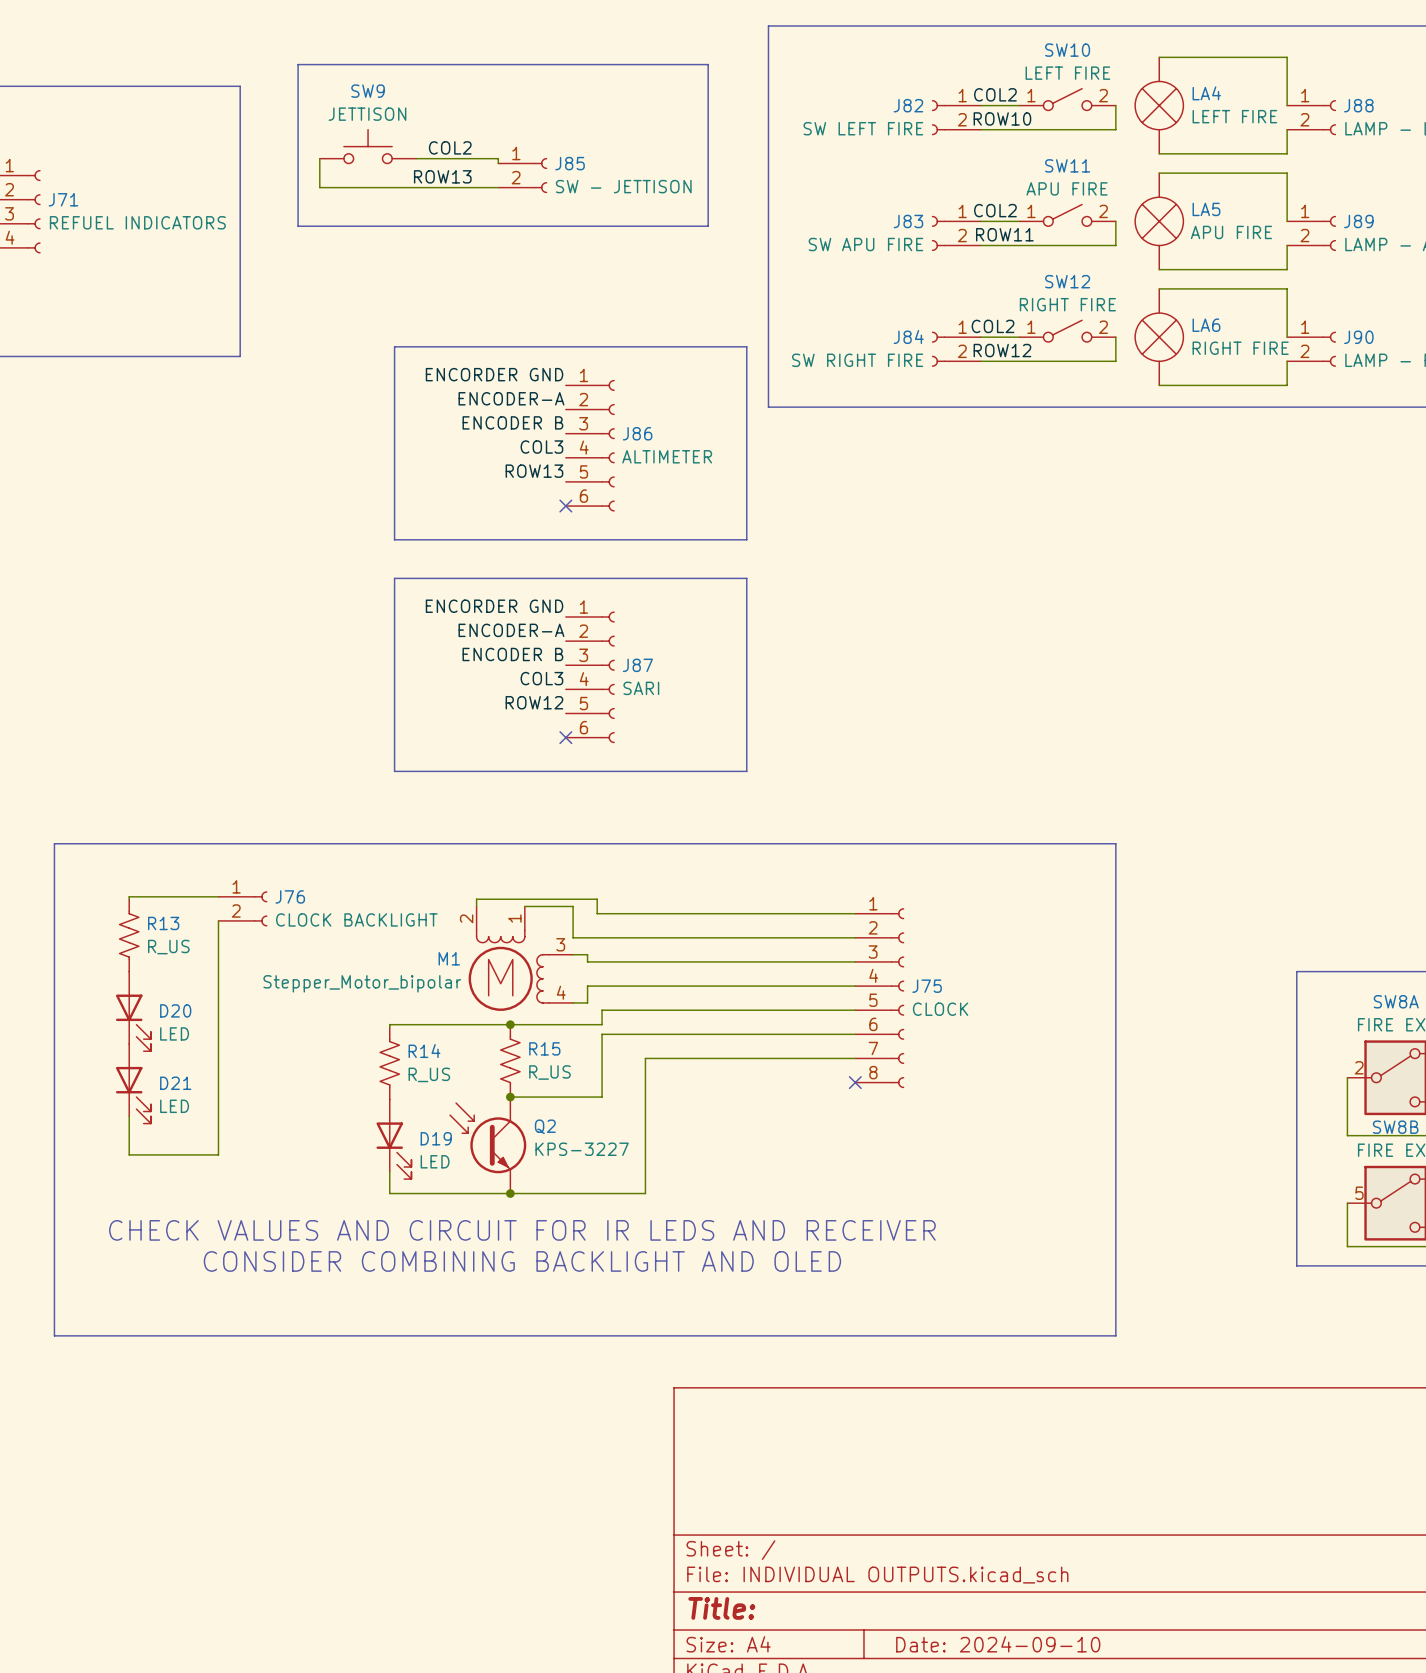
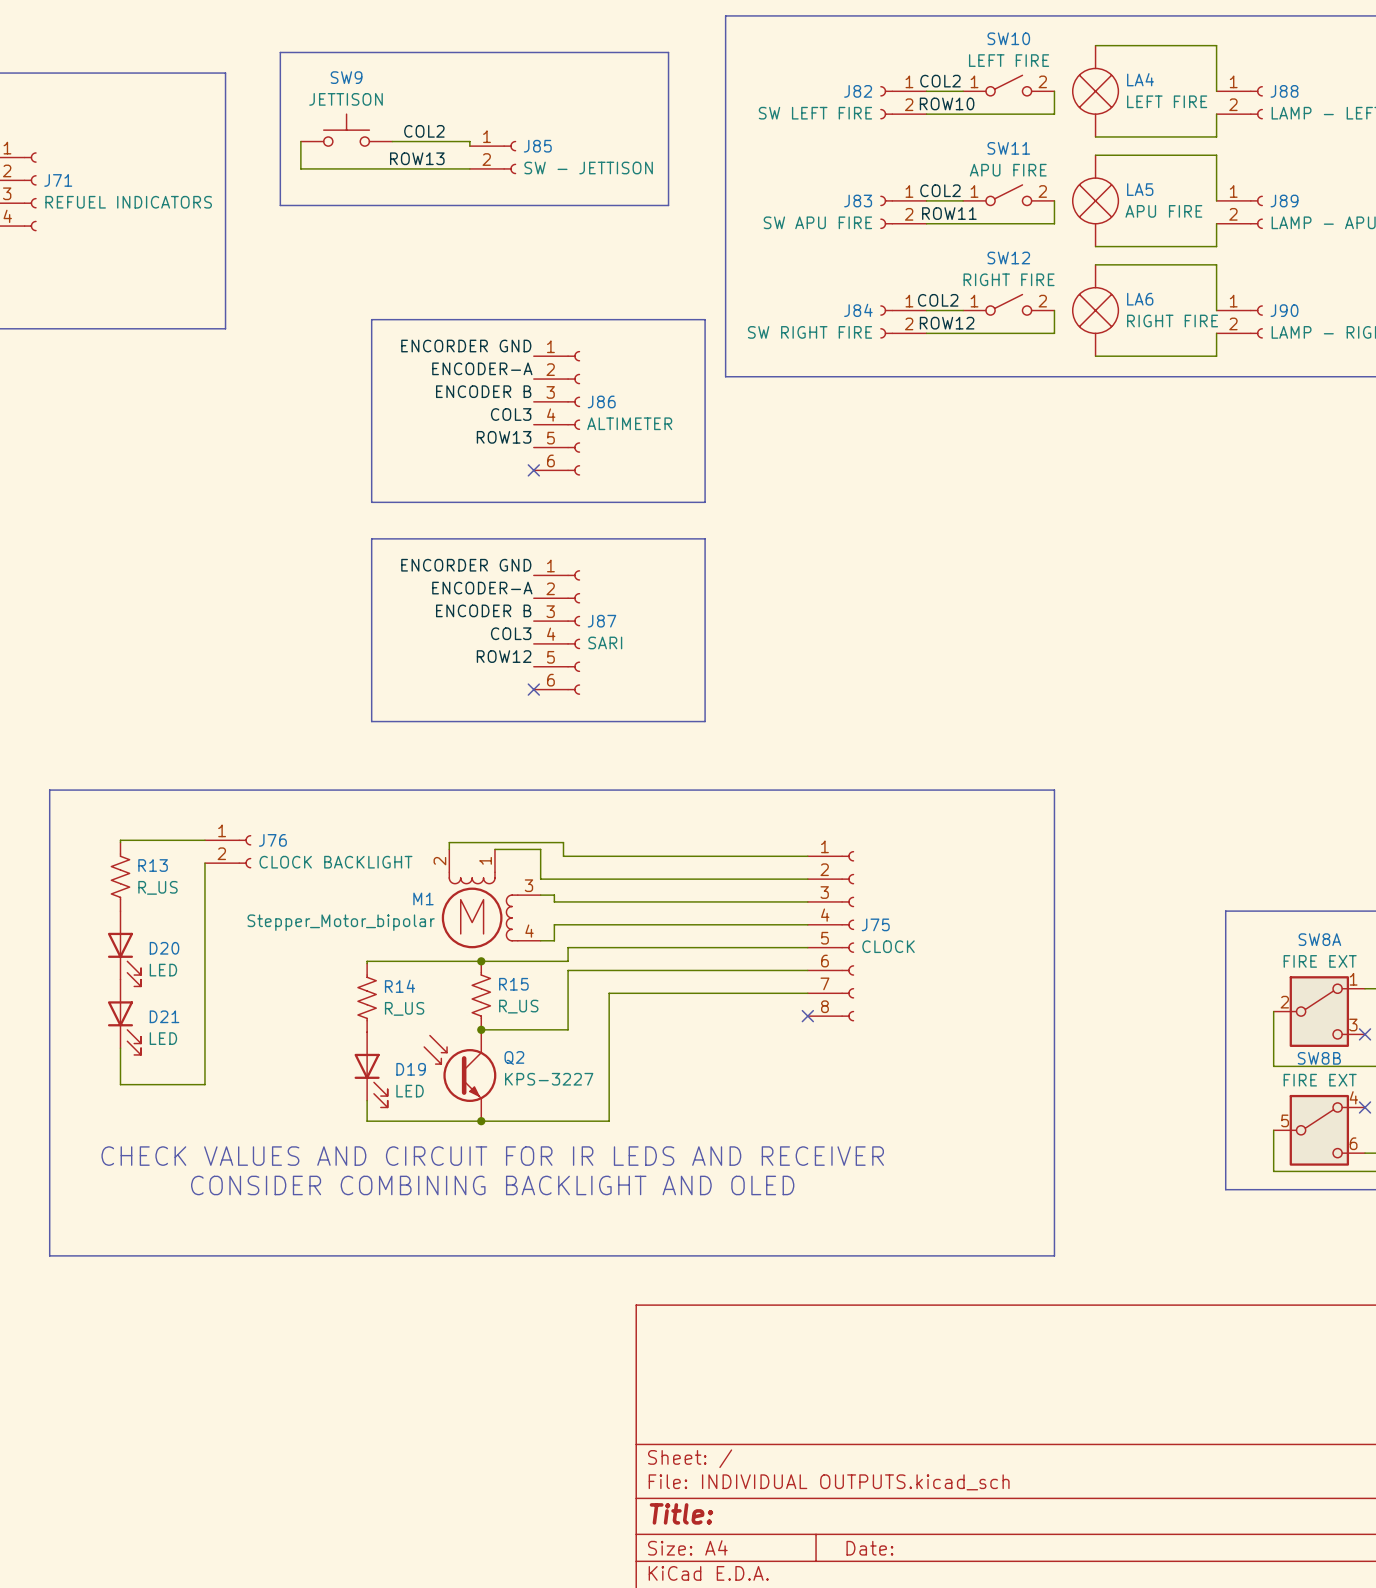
title block: Date: 2024-09-10 (998, 1644) -> Date: (869, 1548)

